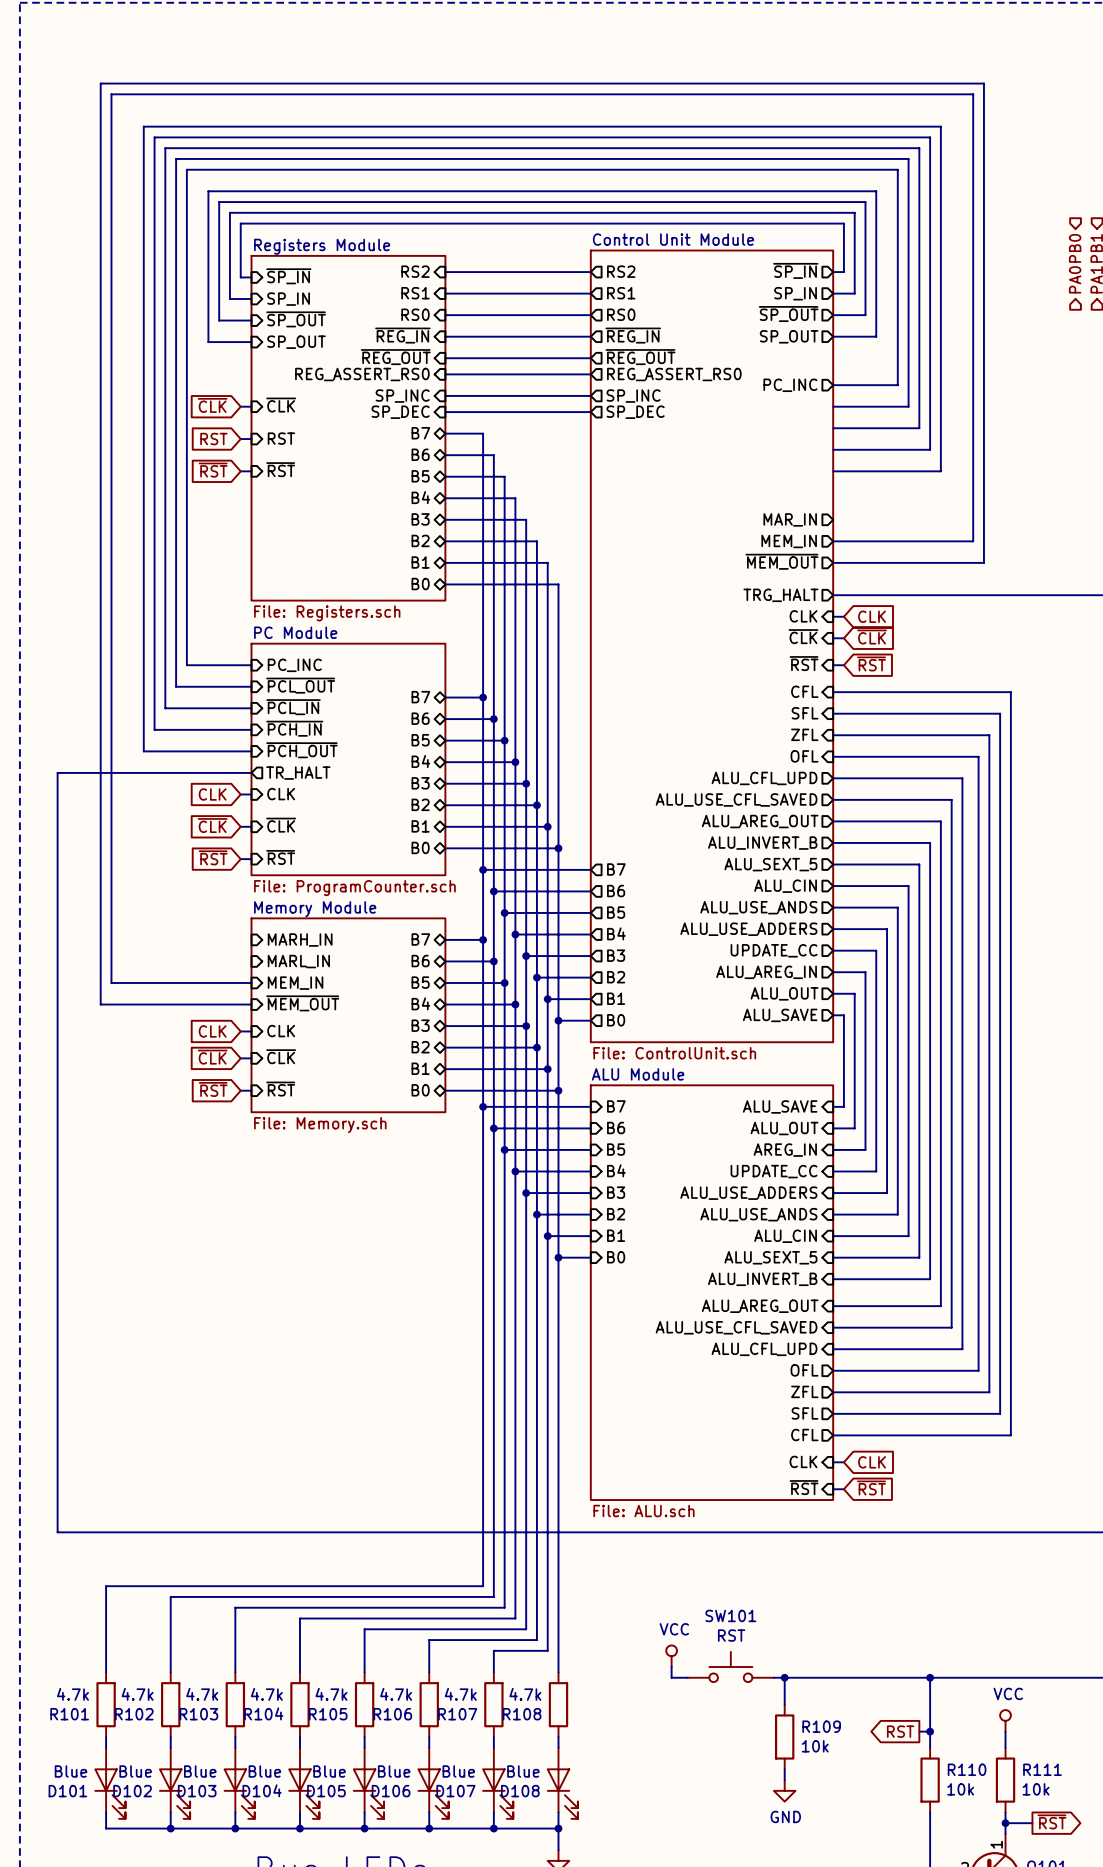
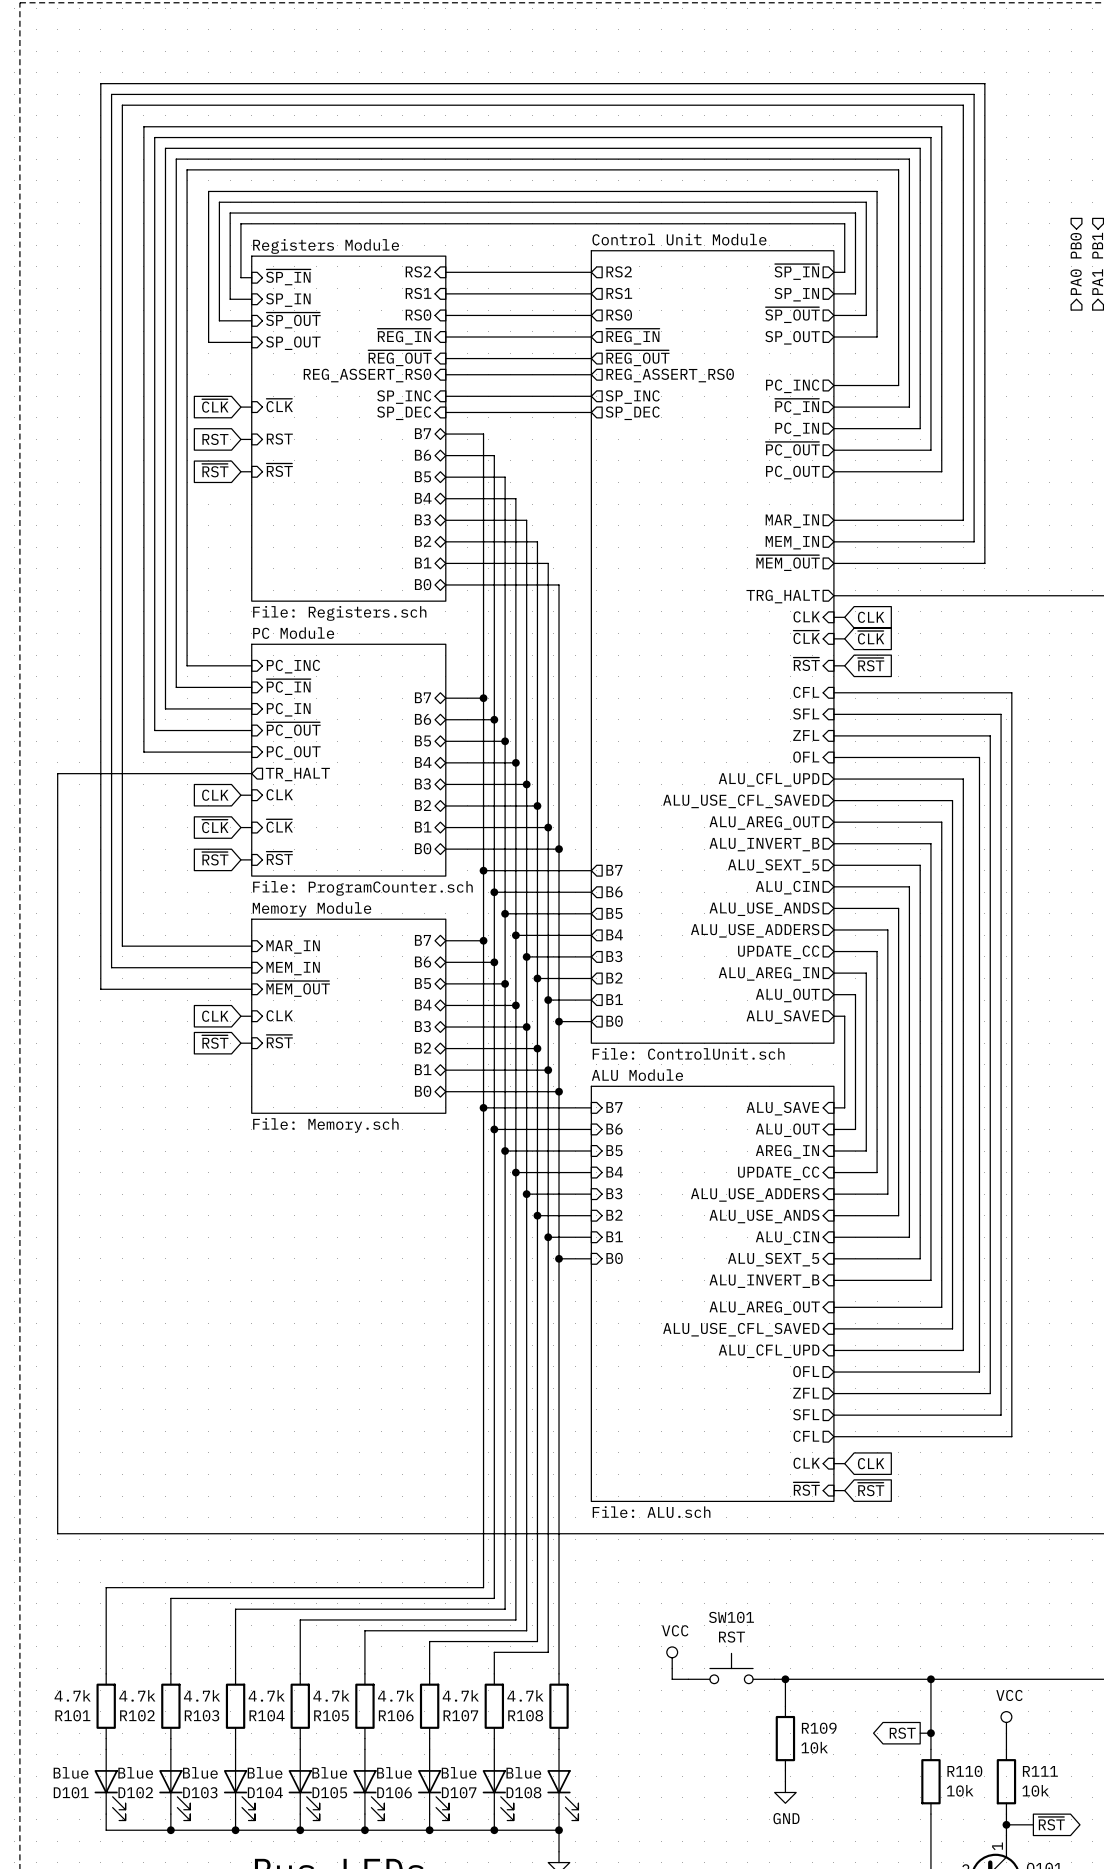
sheet pin: none -> ~{PC_IN} (797, 406)
sheet pin: none -> PC_IN (797, 429)
sheet pin: none -> ~{PC_OUT} (792, 449)
sheet pin: none -> PC_OUT (792, 472)
wire: none -> (833, 520) (963, 520) (963, 105) (122, 105) (122, 946) (251, 946)
sheet pin: ~{PCL_OUT} (300, 685) -> ~{PC_IN} (288, 687)
sheet pin: ~{PCL_IN} (293, 707) -> PC_IN (288, 709)
sheet pin: ~{PCH_IN} (294, 728) -> ~{PC_OUT} (293, 730)
sheet pin: ~{PCH_OUT} (301, 750) -> PC_OUT (293, 752)
sheet pin: MARH_IN (300, 940) -> MAR_IN (293, 947)
sheet pin: MARL_IN (298, 961) -> none
wire: (111, 966) (111, 982) (251, 982) -> (111, 967) (251, 967)
sheet pin position: MEM_IN (295, 983) -> MEM_IN (293, 968)
wire: (100, 988) (100, 1004) (251, 1004) -> (100, 989) (251, 989)
sheet pin position: ~{MEM_OUT} (302, 1003) -> ~{MEM_OUT} (298, 988)
global label position: CLK (212, 1031) -> CLK (215, 1016)
wire: (240, 1031) (251, 1031) -> (240, 1016) (251, 1016)
sheet pin position: CLK (281, 1031) -> CLK (279, 1015)
sheet pin: ~{CLK} (281, 1056) -> none
global label: ~{CLK} (212, 1057) -> none
wire: (240, 1058) (251, 1058) -> (240, 1043) (251, 1043)
global label position: ~{RST} (213, 1089) -> ~{RST} (215, 1042)
sheet pin position: ~{RST} (280, 1089) -> ~{RST} (279, 1041)
wire: (240, 1090) (251, 1090) -> none

